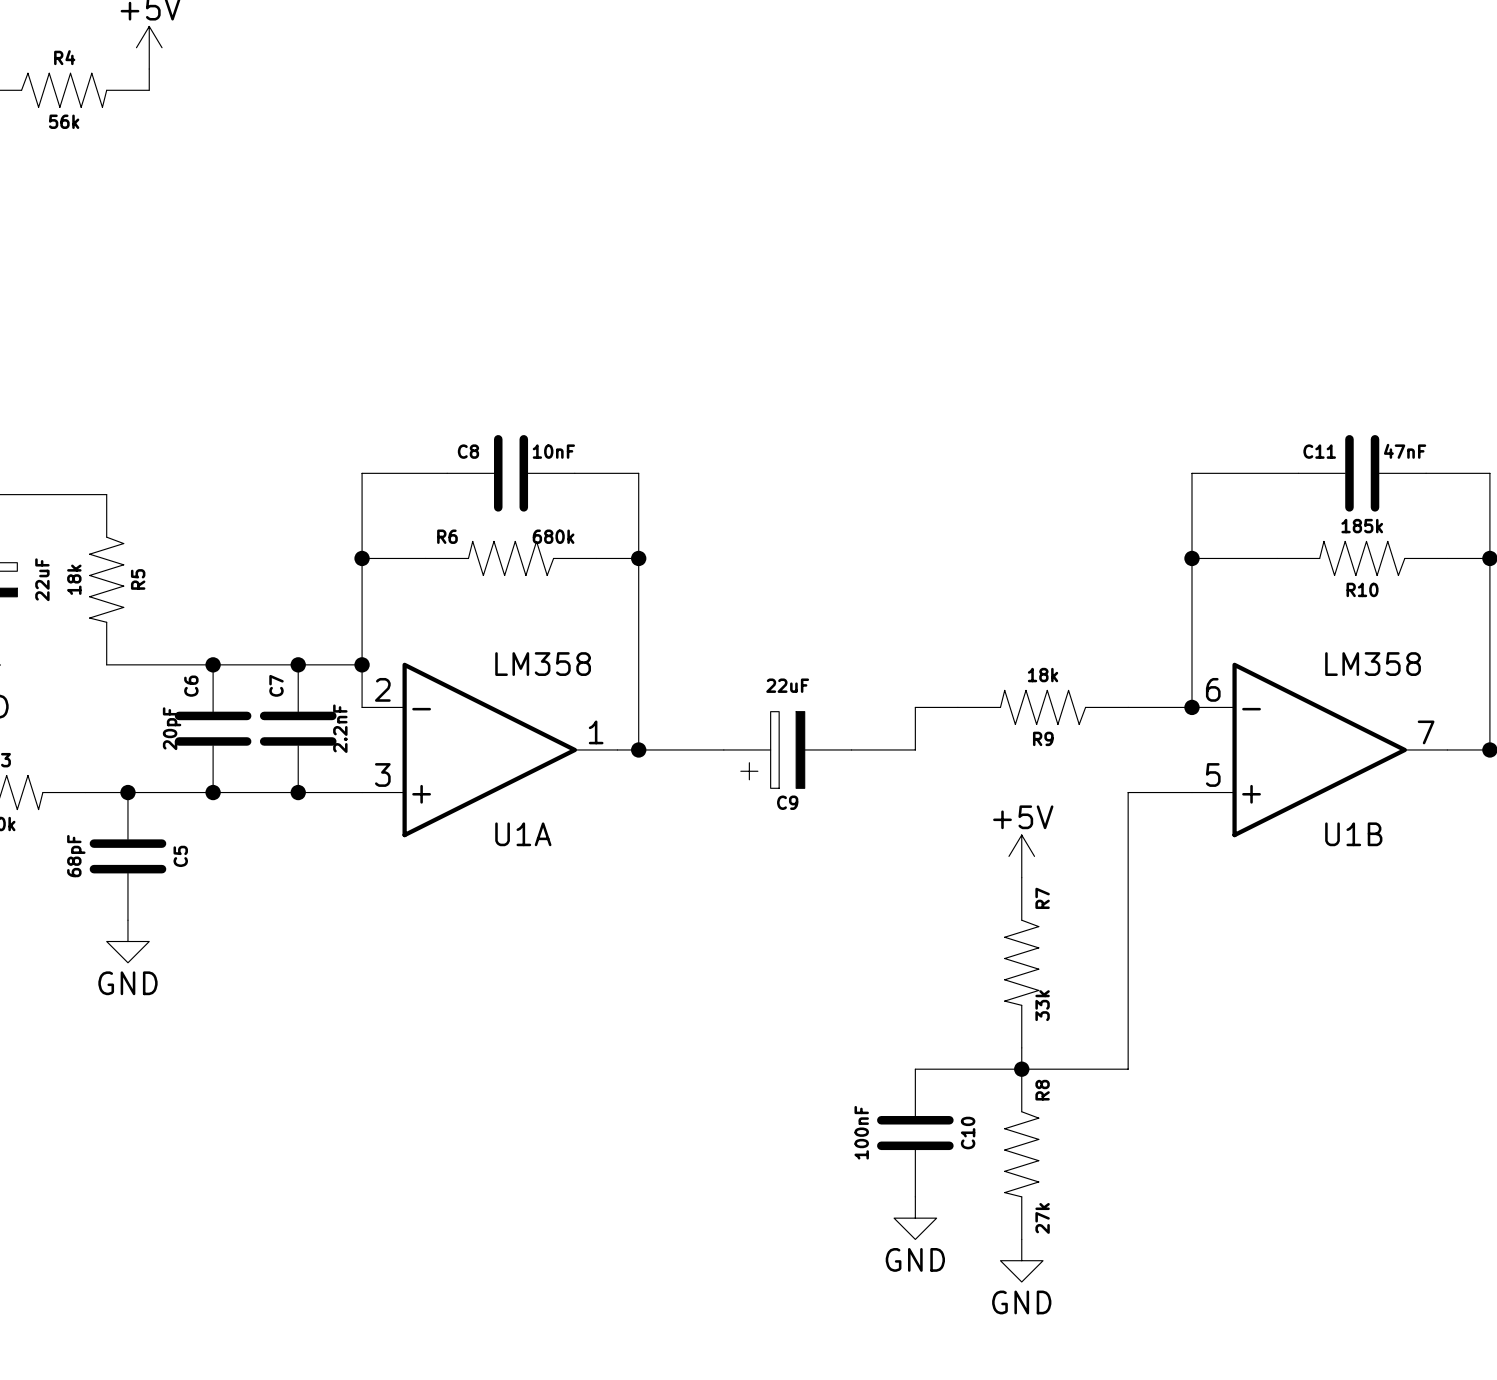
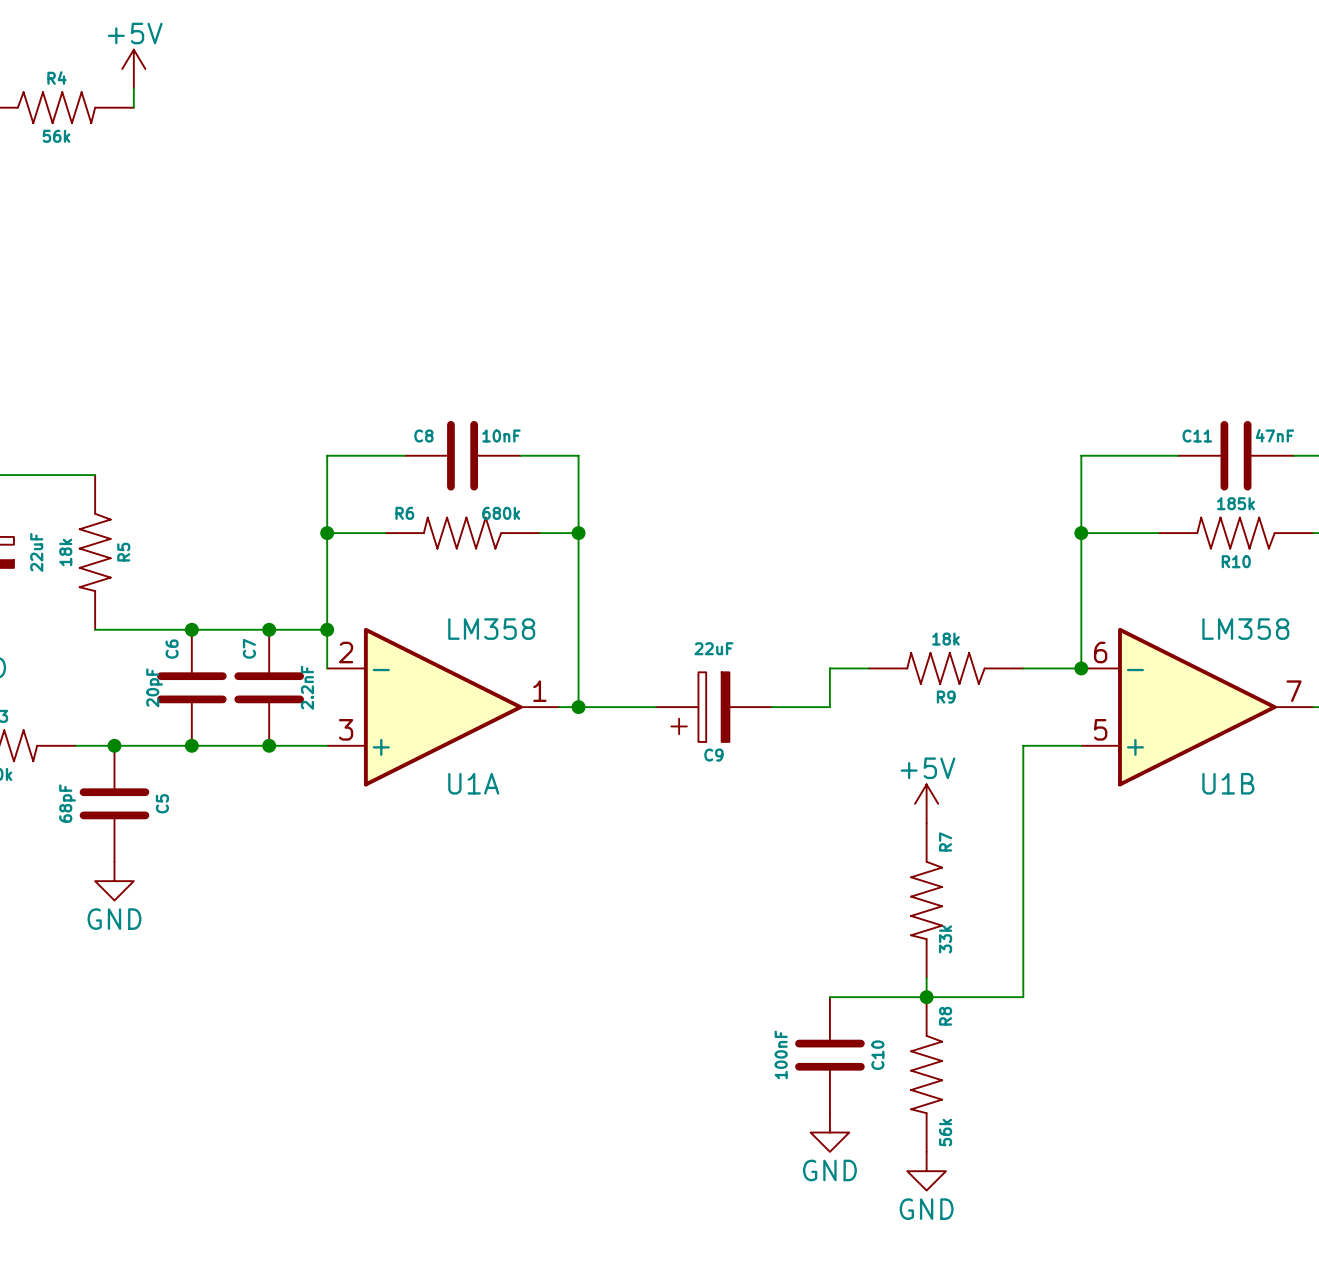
R8 value: 27k (1042, 1218) -> 56k (945, 1132)

